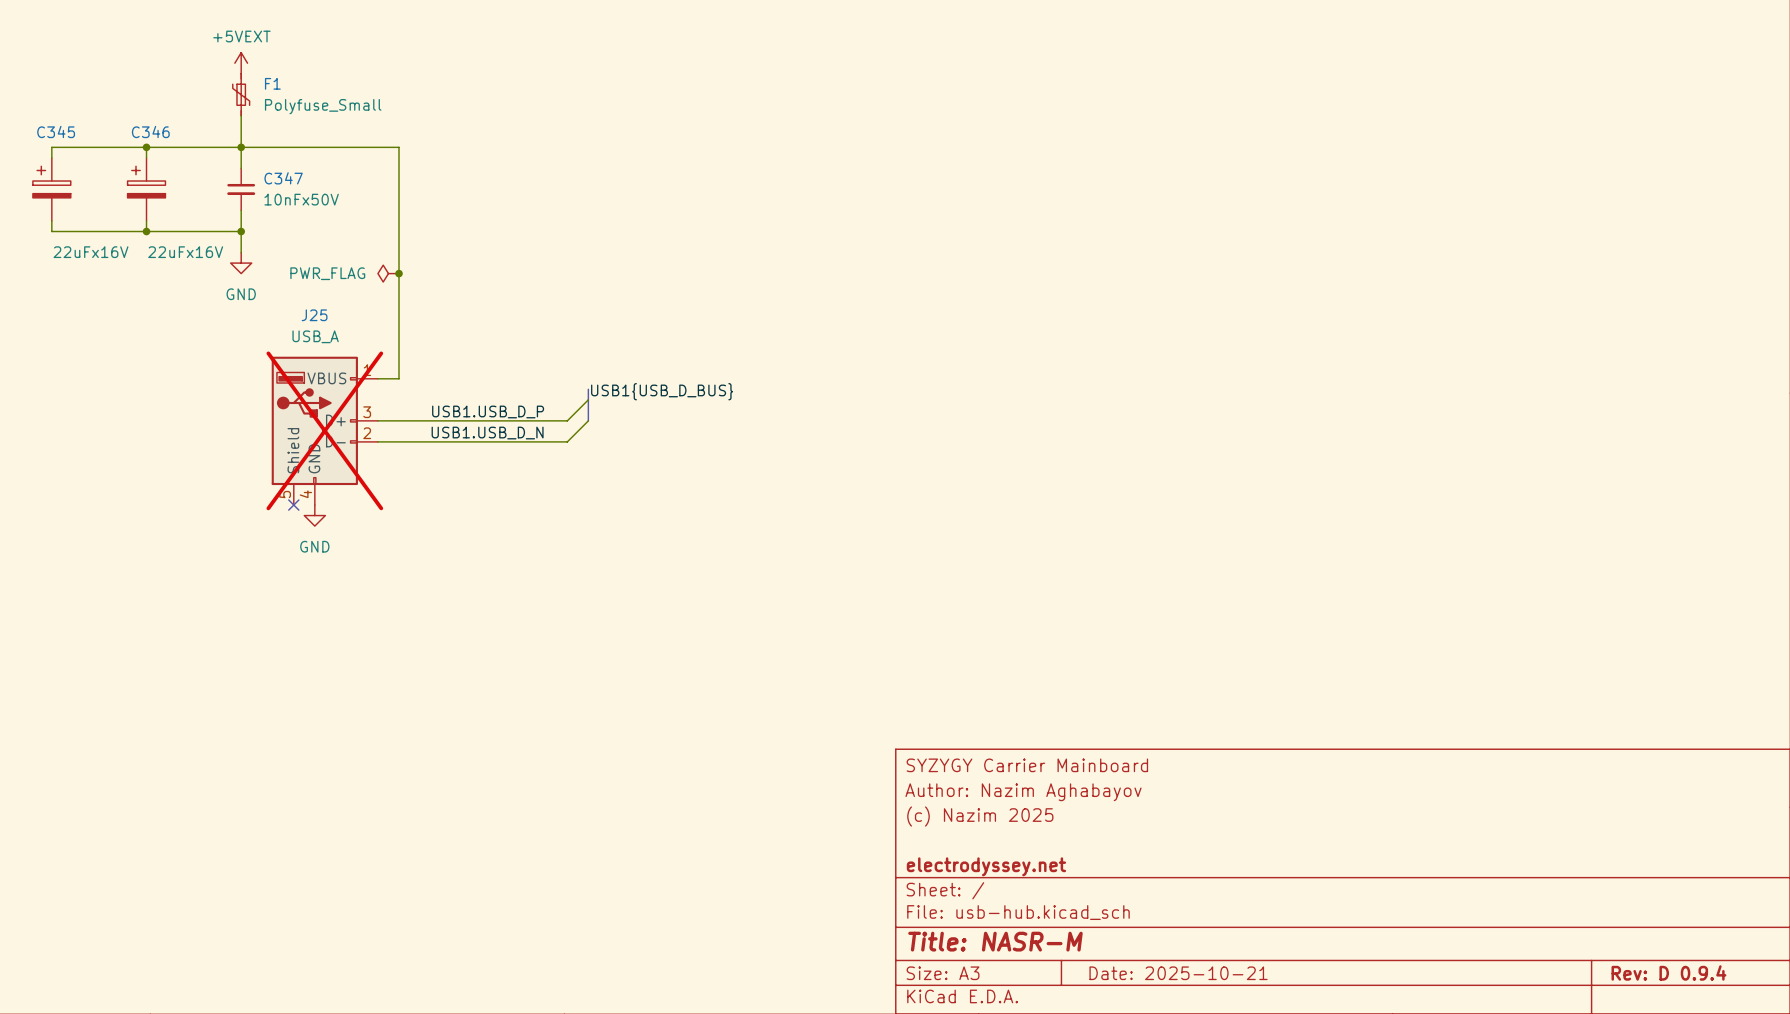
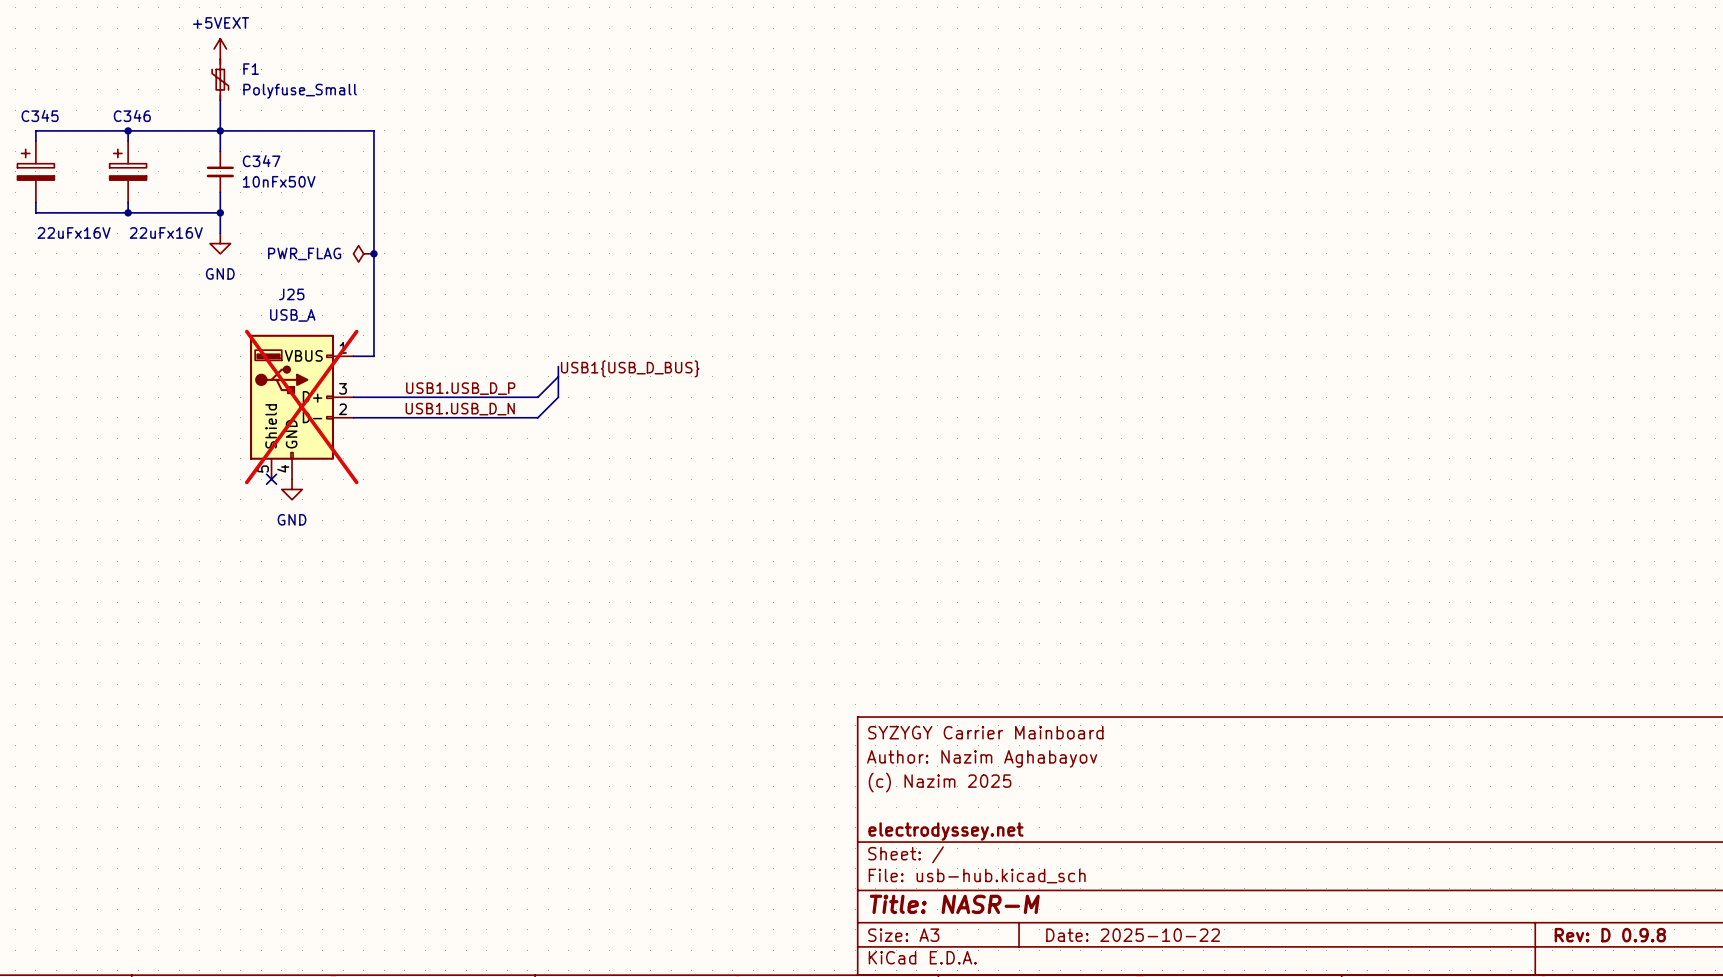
title block: Rev: D 0.9.4 (1668, 972) -> Rev: D 0.9.8 (1610, 935)
title block: Date: 2025-10-21 (1178, 973) -> Date: 2025-10-22 (1133, 935)

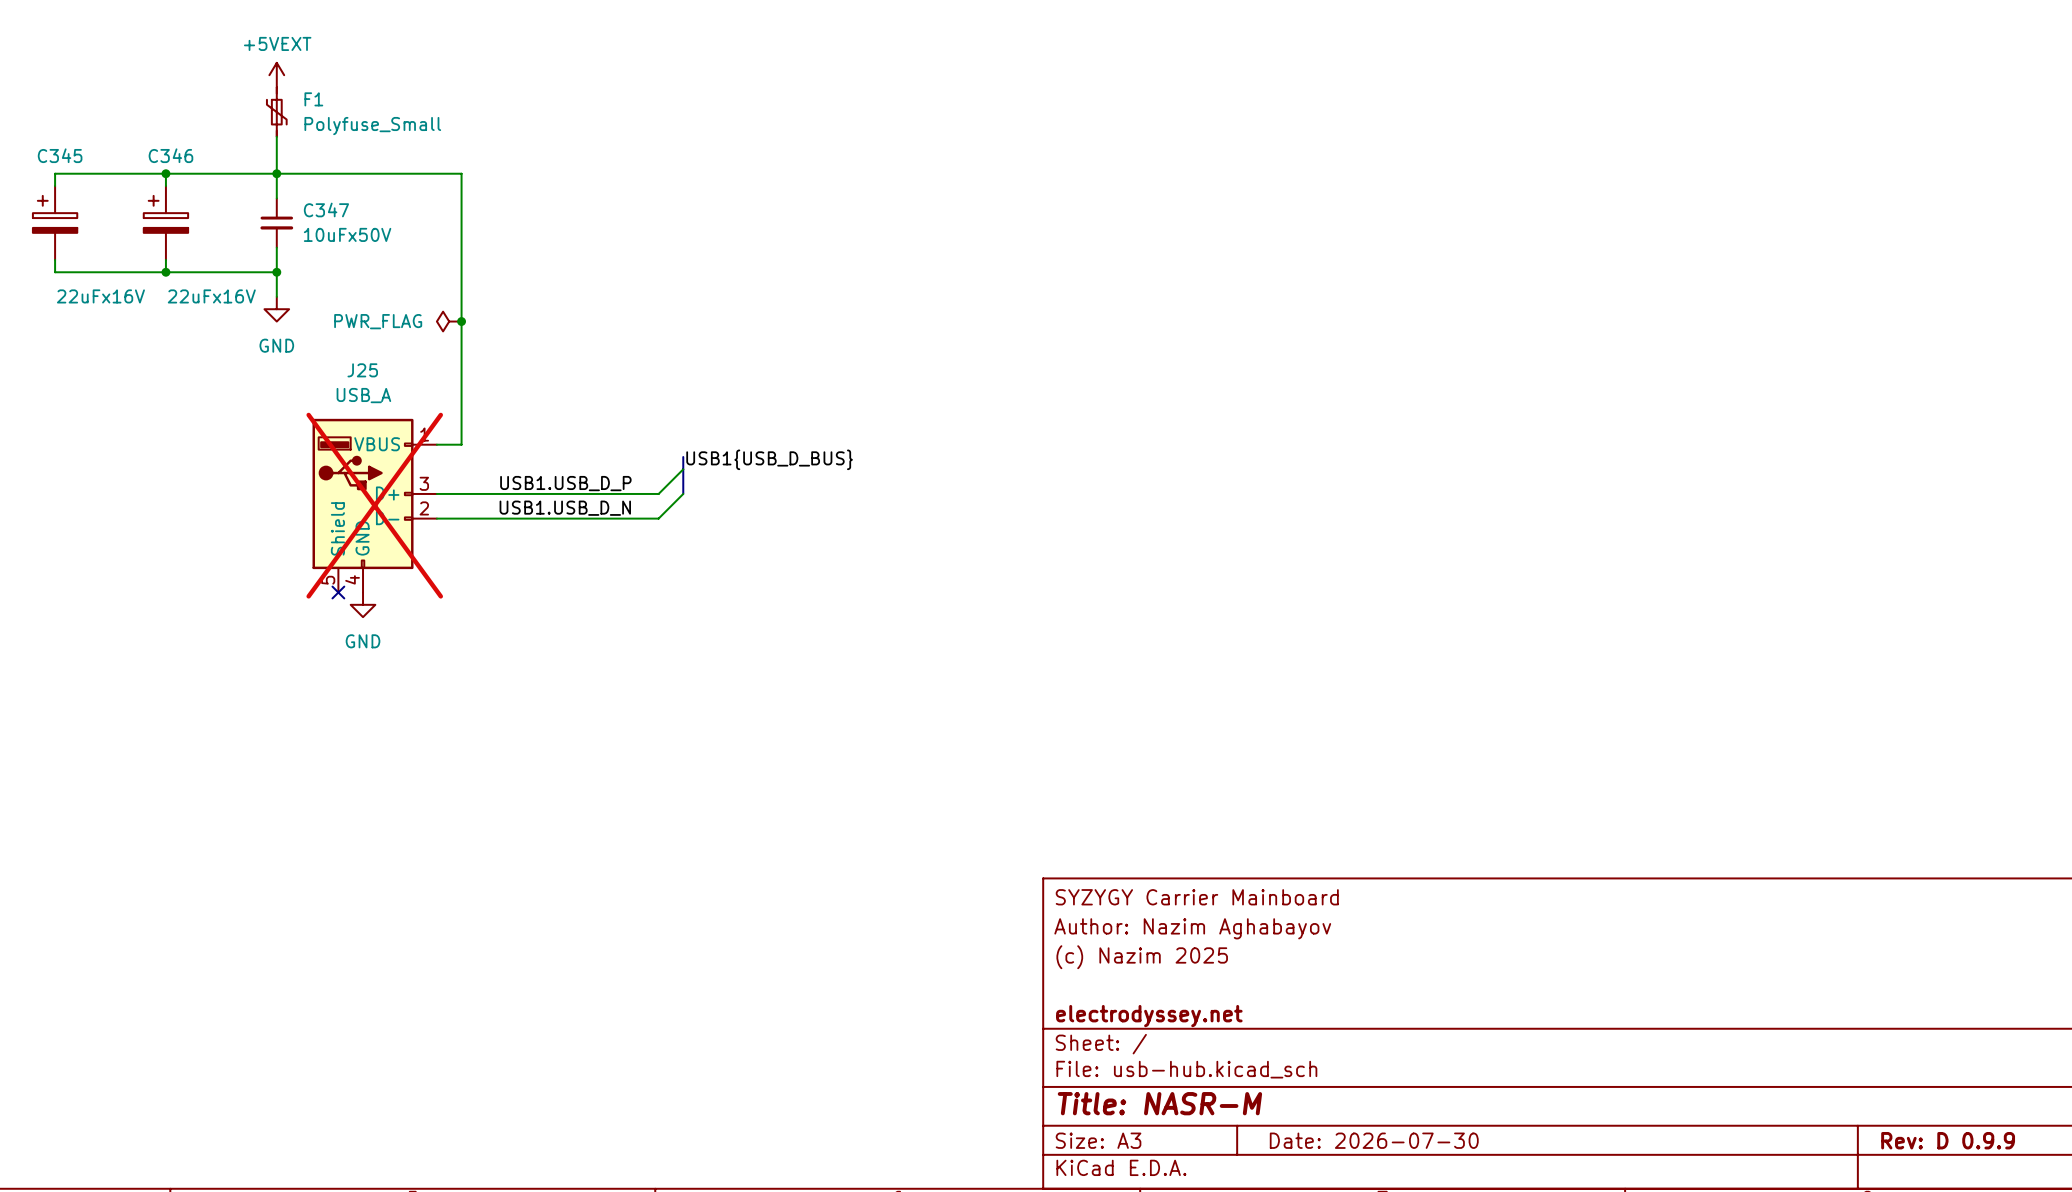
C347 value: 10nFx50V (279, 181) -> 10uFx50V (347, 234)
title block: Date: 2025-10-22 (1133, 935) -> Date: 2026-07-30 (1374, 1140)
title block: Rev: D 0.9.8 (1610, 935) -> Rev: D 0.9.9 (1948, 1140)

